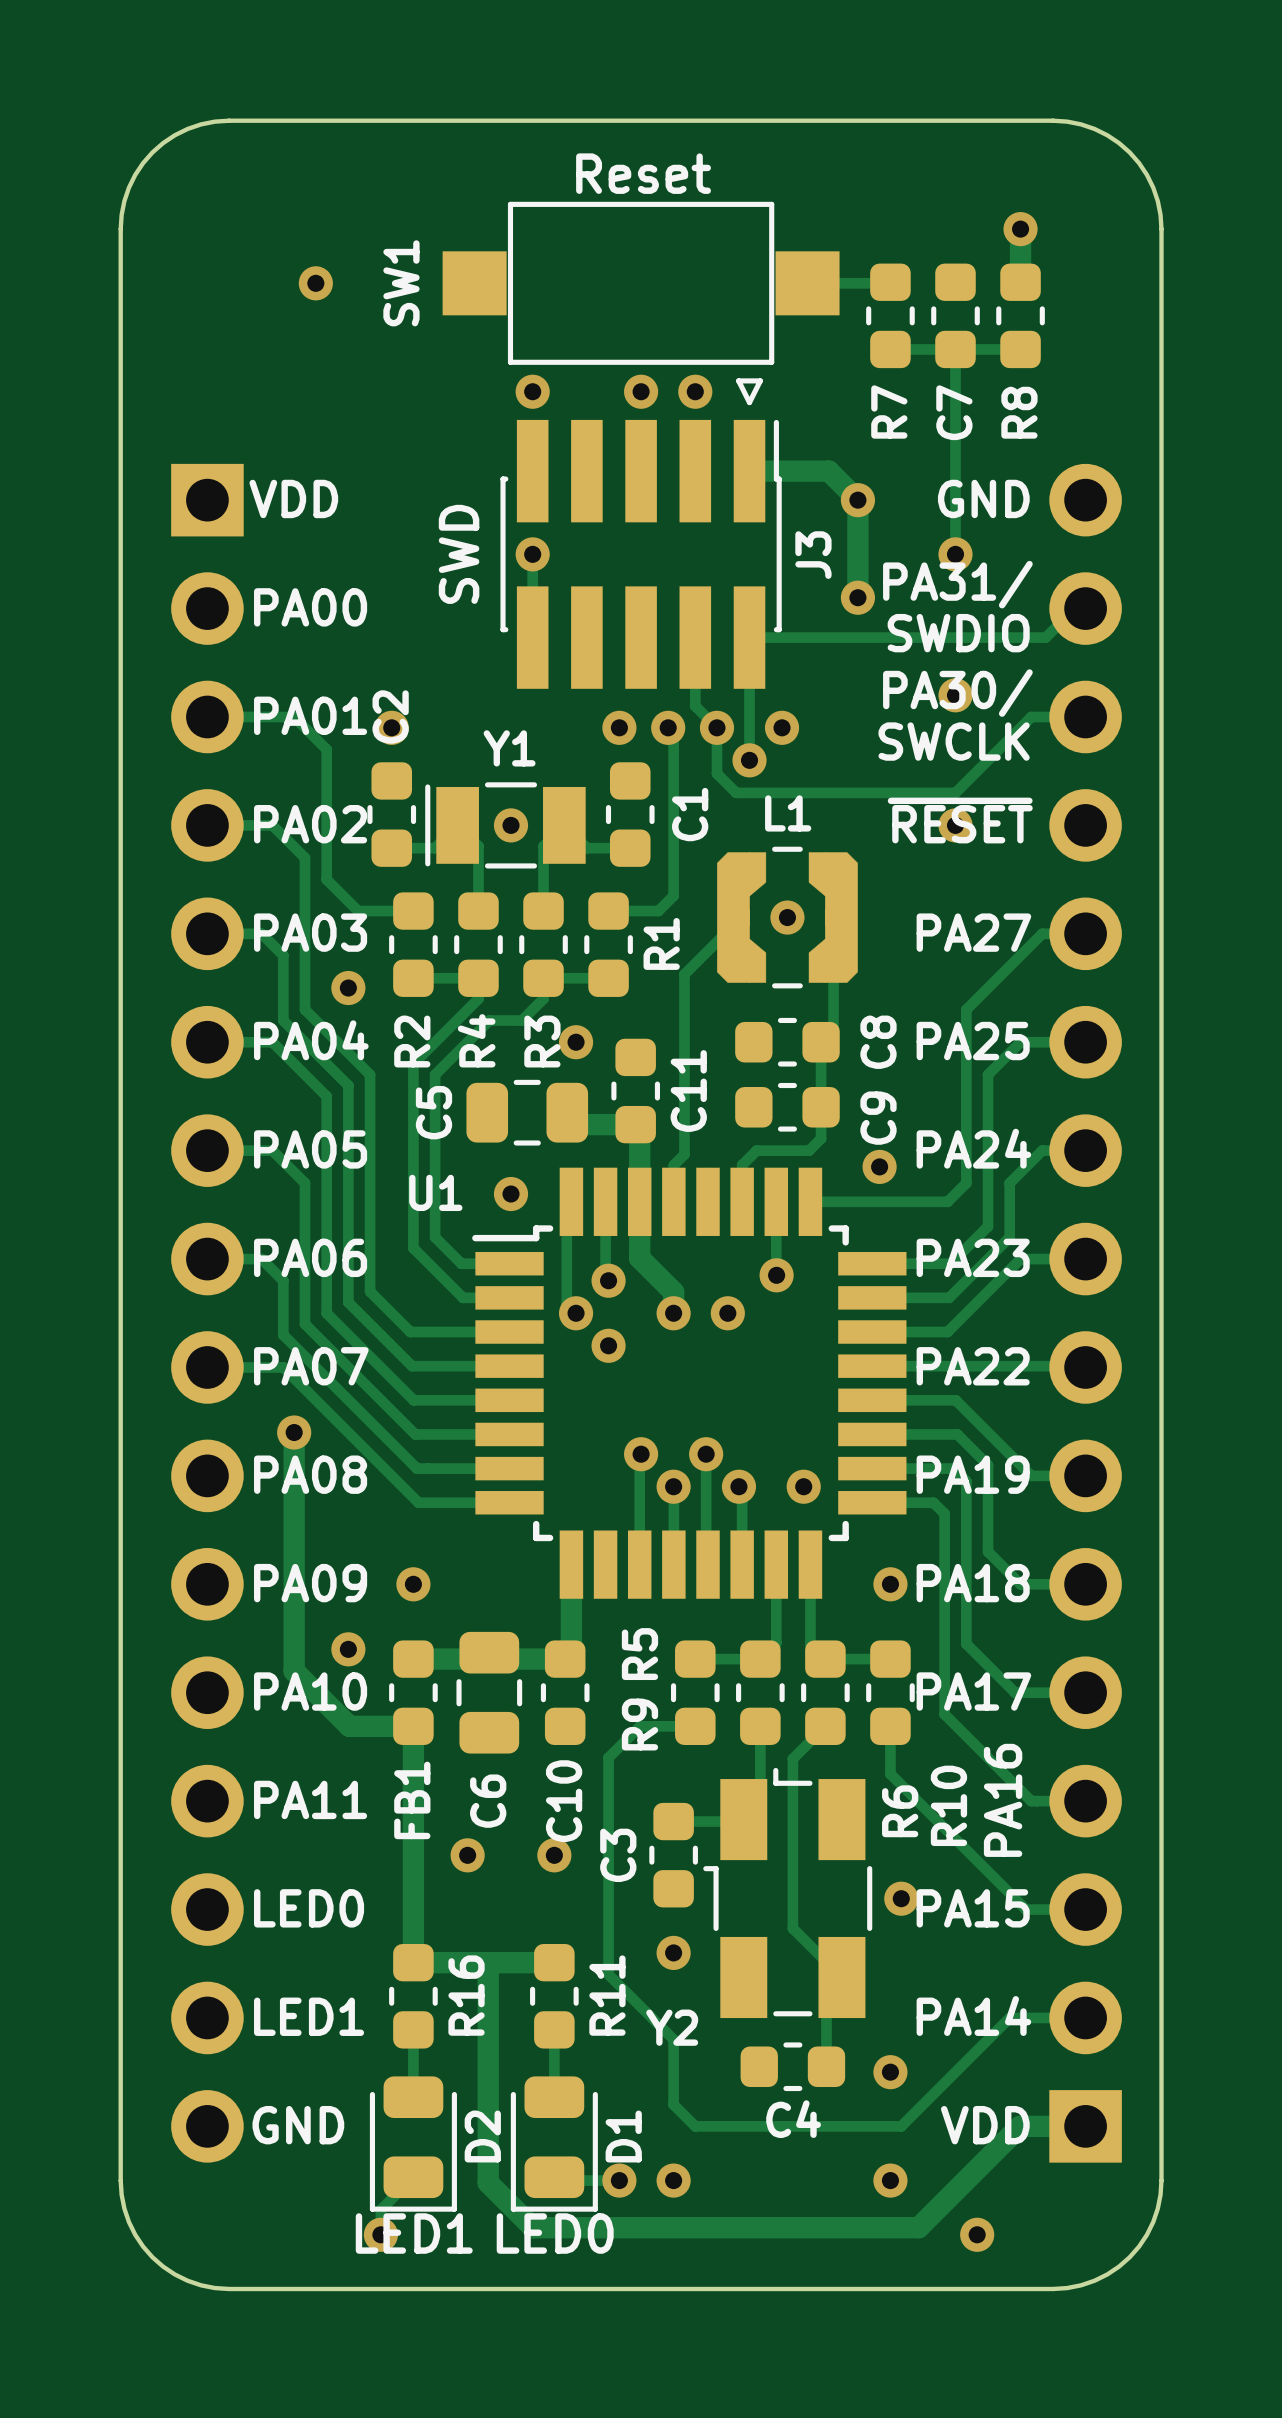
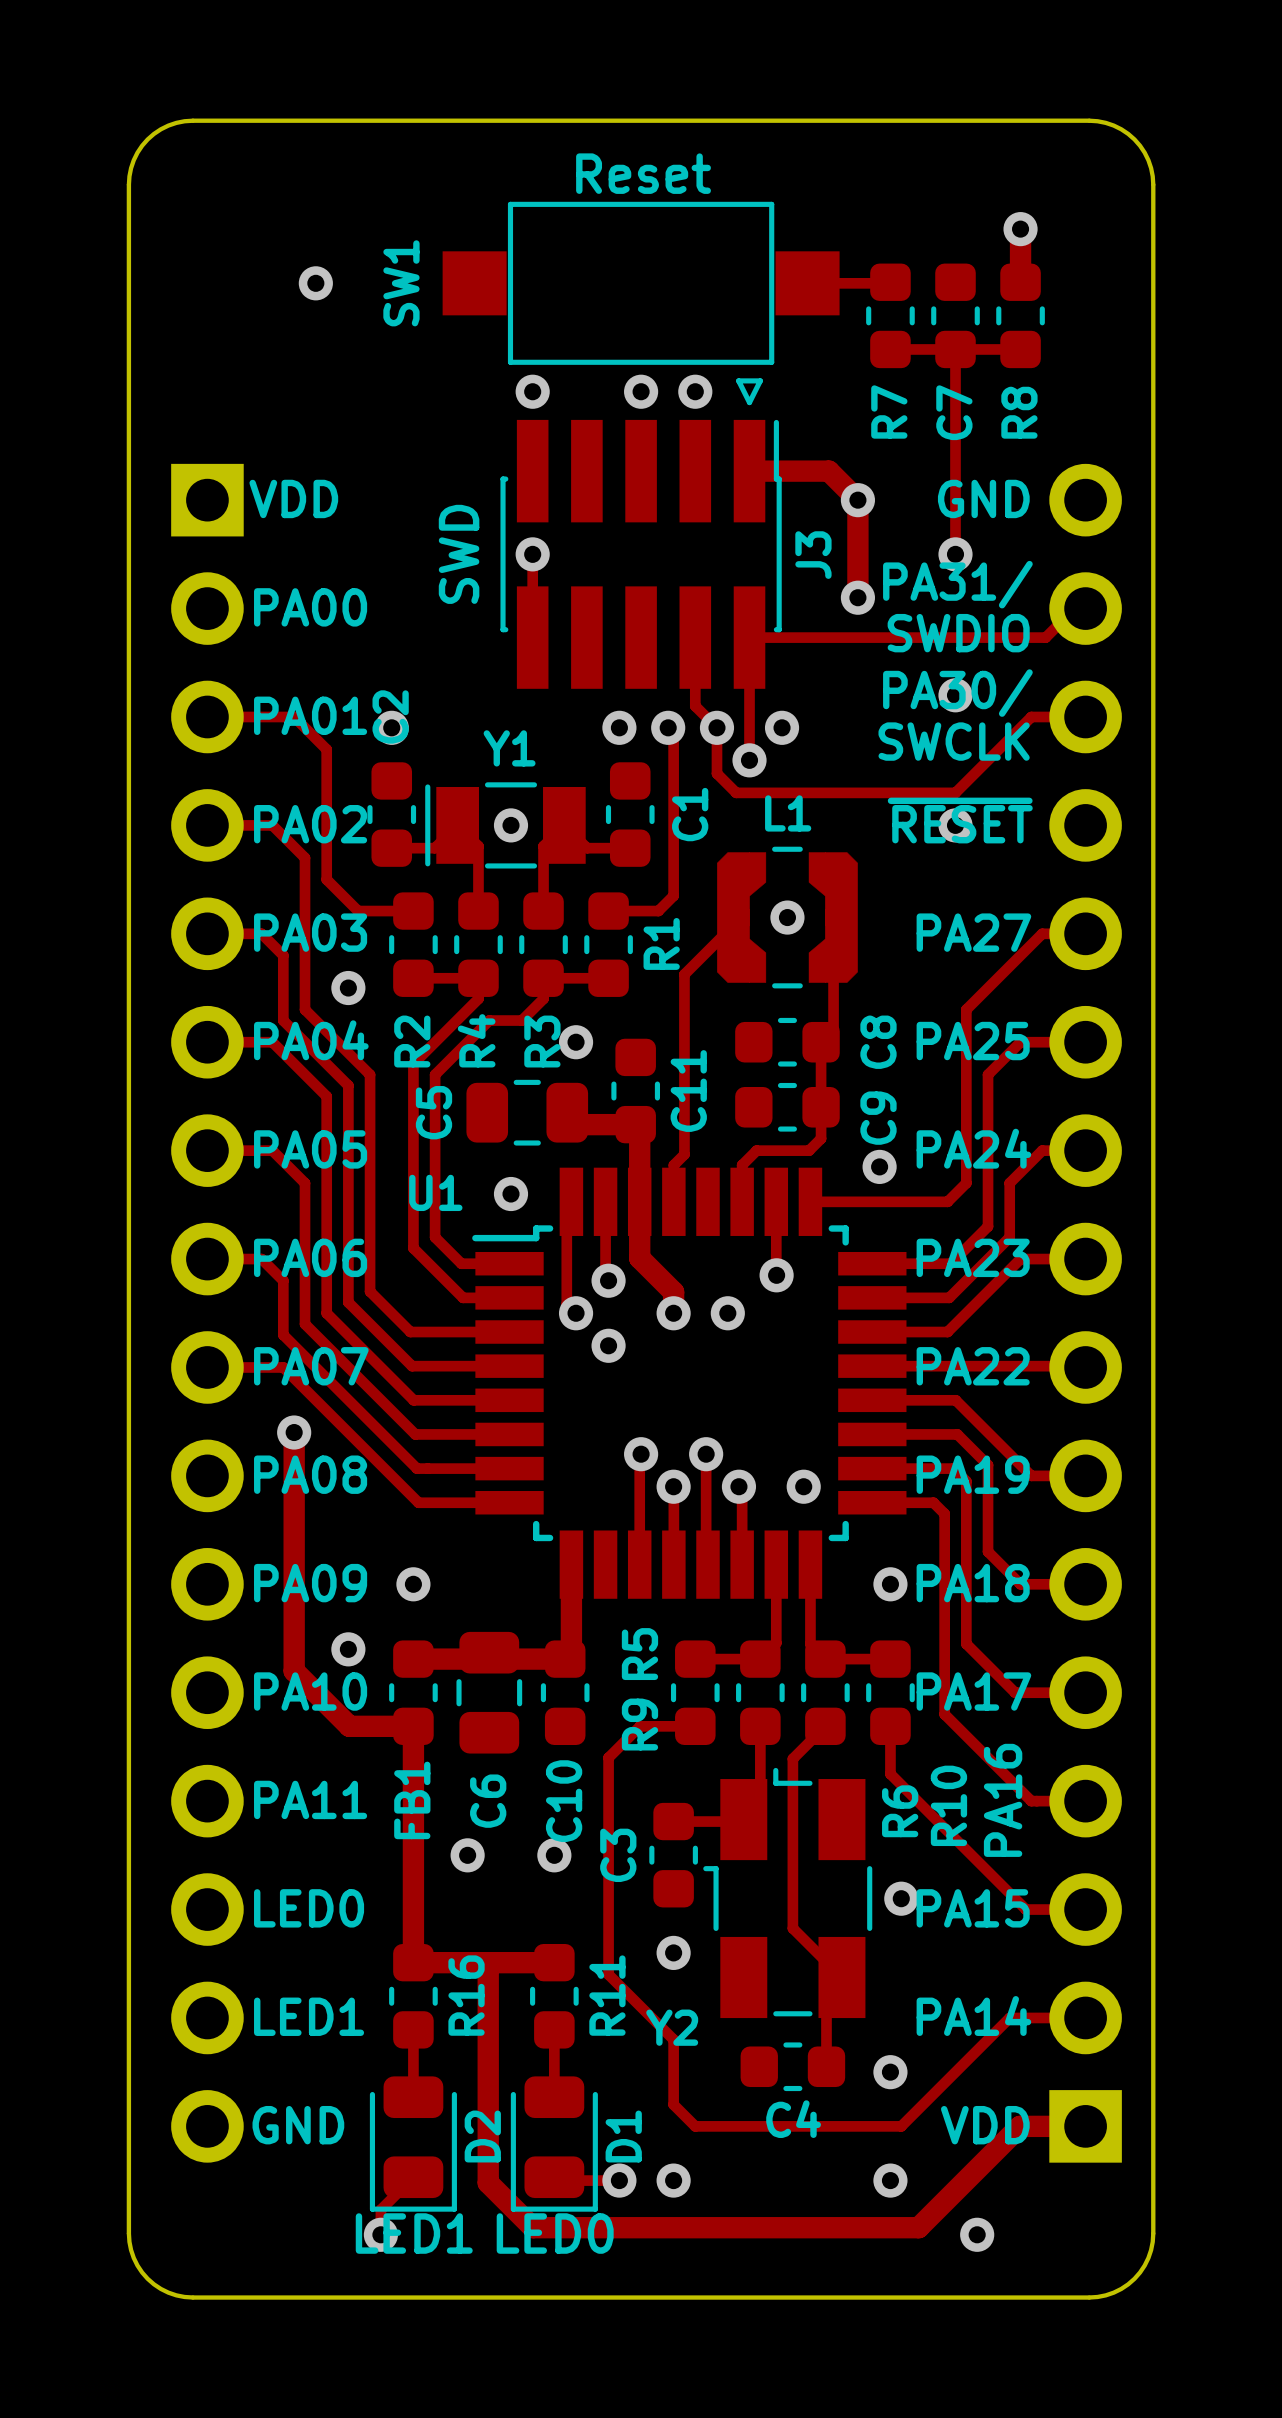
board edge: (229, 120) (201, 124) (187, 128) (163, 143) (152, 152) (135, 174) (128, 187) (121, 214) (120, 229) (120, 2180) (121, 2194) (128, 2222) (143, 2246) (163, 2266) (187, 2280) (214, 2288) (1053, 2288) (1081, 2285) (1094, 2280) (1107, 2274) (1129, 2257) (1139, 2246) (1153, 2222) (1157, 2208) (1161, 2180) (1161, 229) (1160, 214) (1153, 187) (1146, 174) (1129, 152) (1119, 143) (1094, 128) (1081, 124) (1053, 120) -> (229, 120) (184, 121) (160, 129) (147, 139) (137, 152) (131, 168) (128, 184) (128, 2233) (133, 2258) (142, 2272) (153, 2284) (168, 2292) (192, 2297) (1089, 2297) (1113, 2292) (1134, 2278) (1148, 2258) (1153, 2233) (1153, 184) (1151, 168) (1144, 152) (1134, 139) (1121, 129) (1097, 121) (1053, 120)

